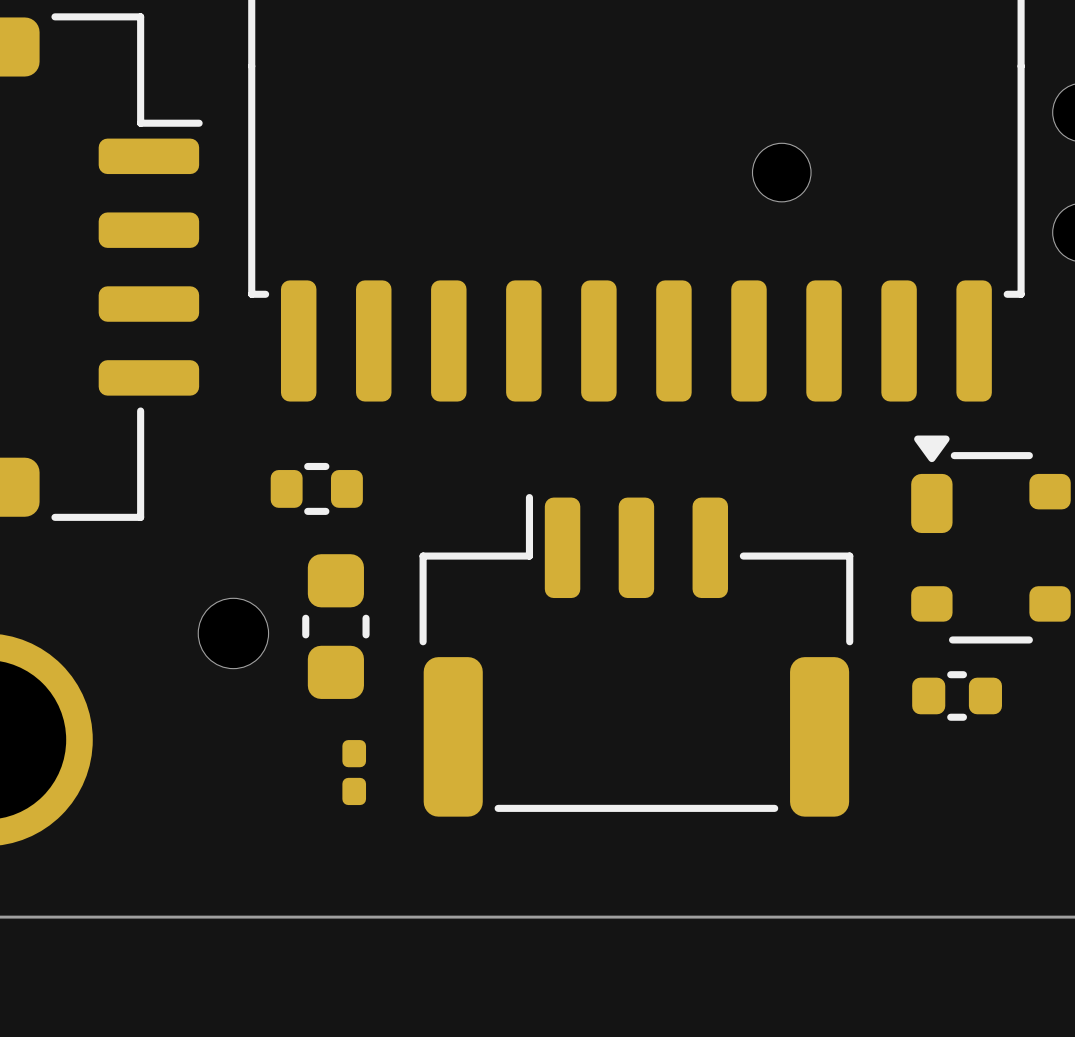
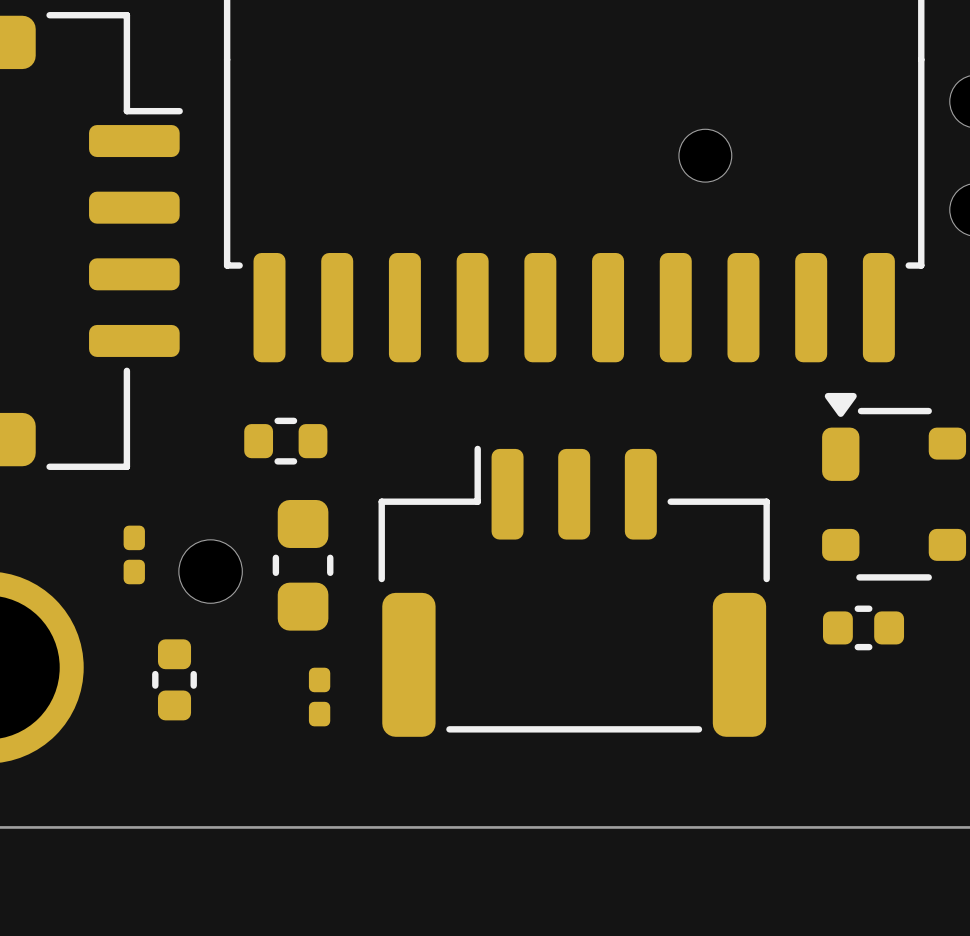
part: none -> (134, 554)
part: none -> (174, 679)

